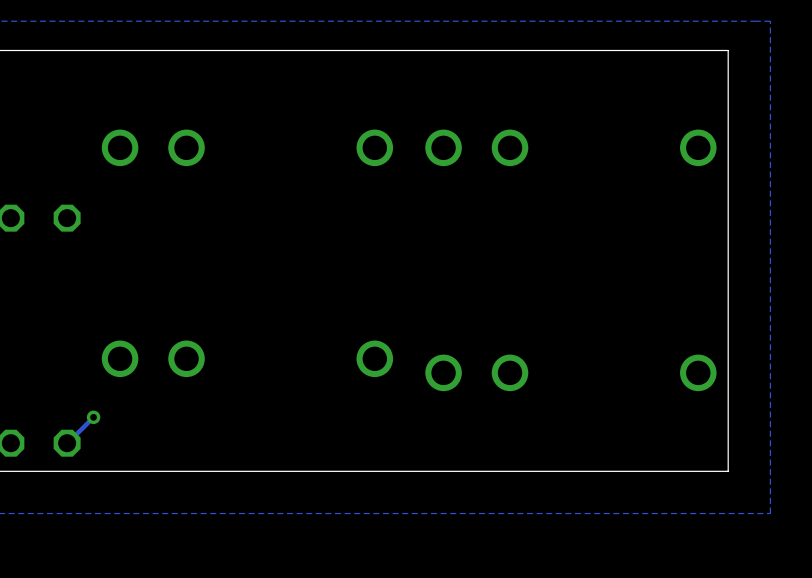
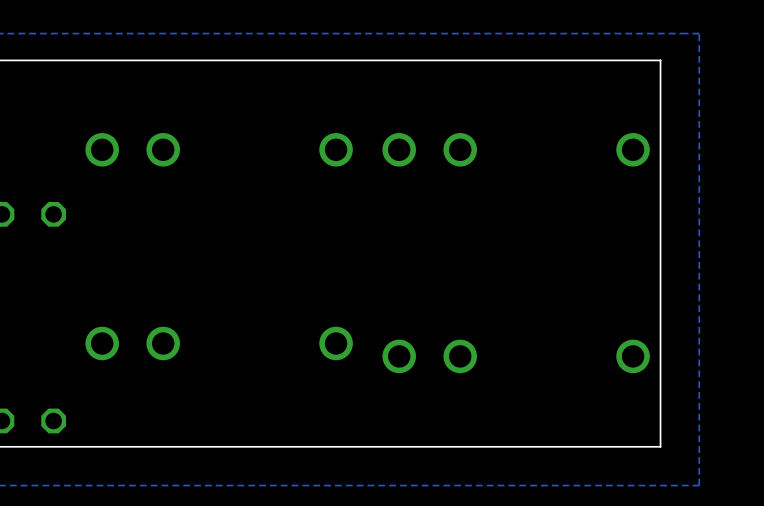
track: (93, 417) (67, 443) -> none
via: (93, 417) -> none

